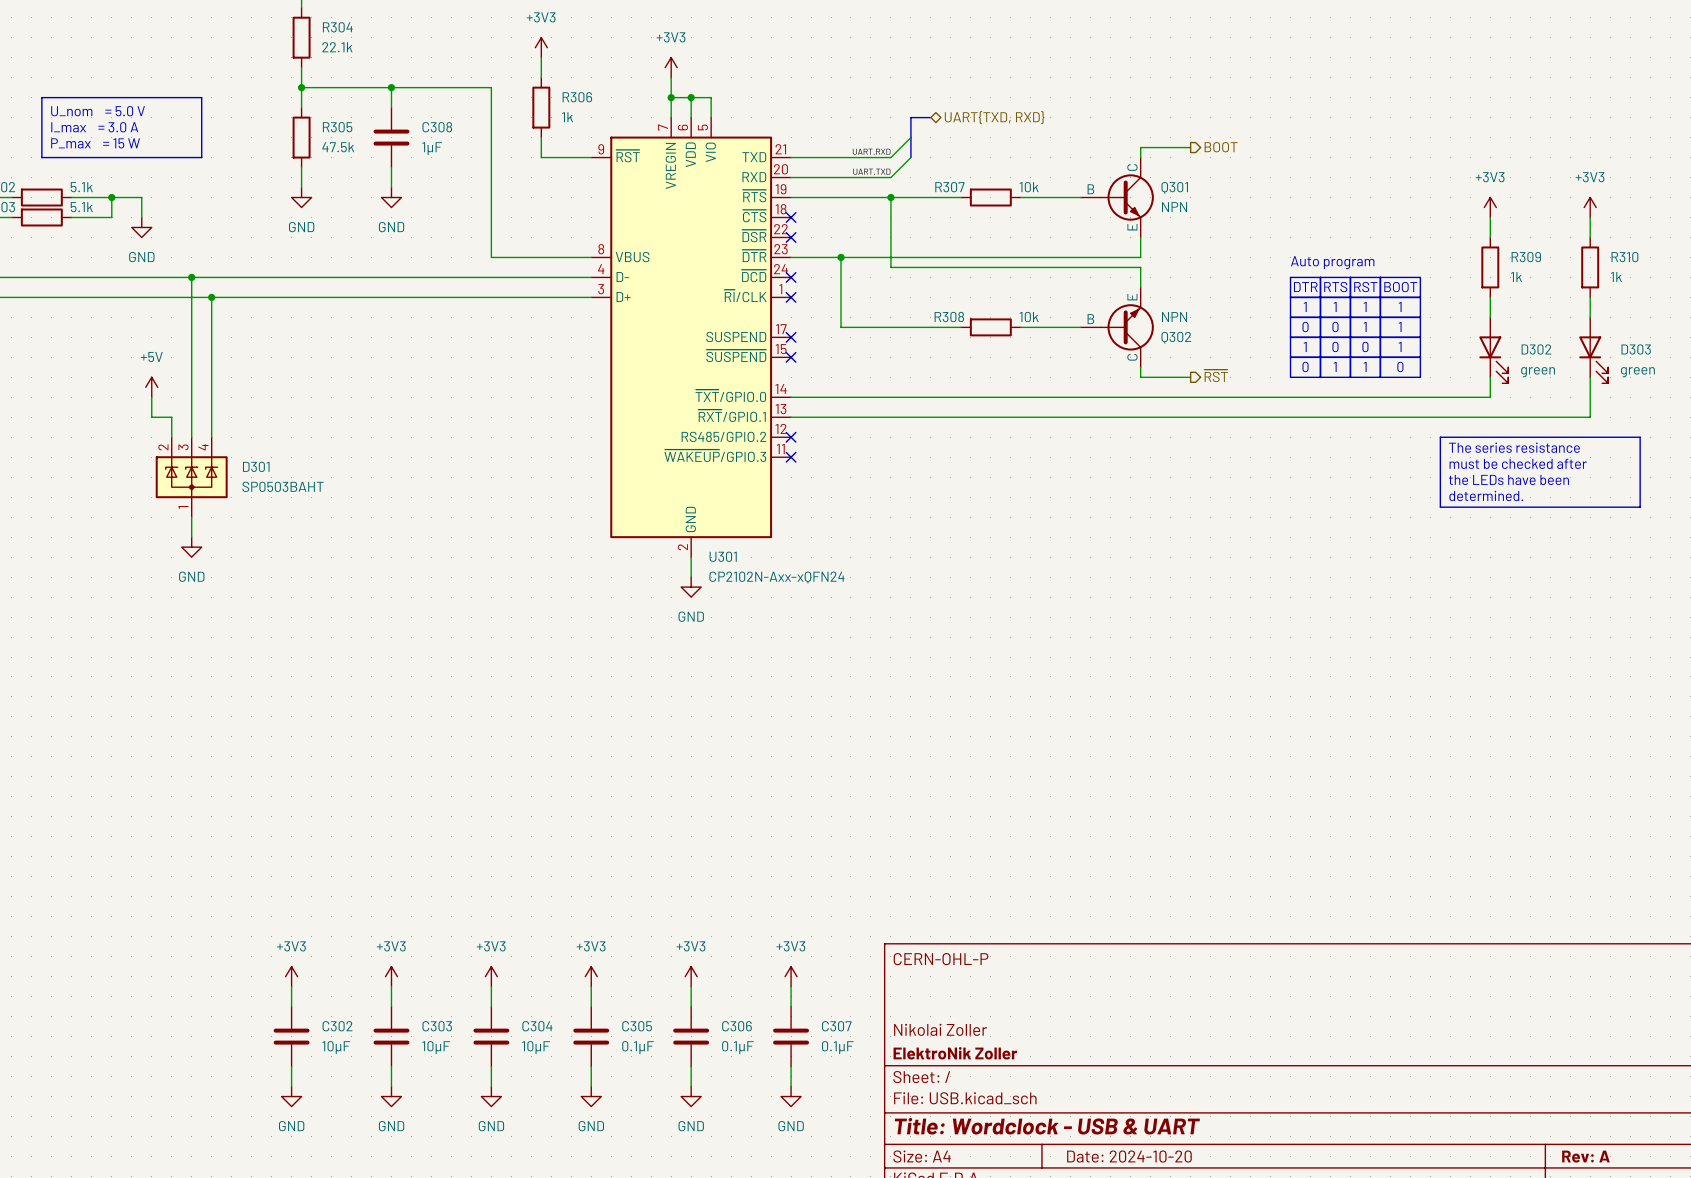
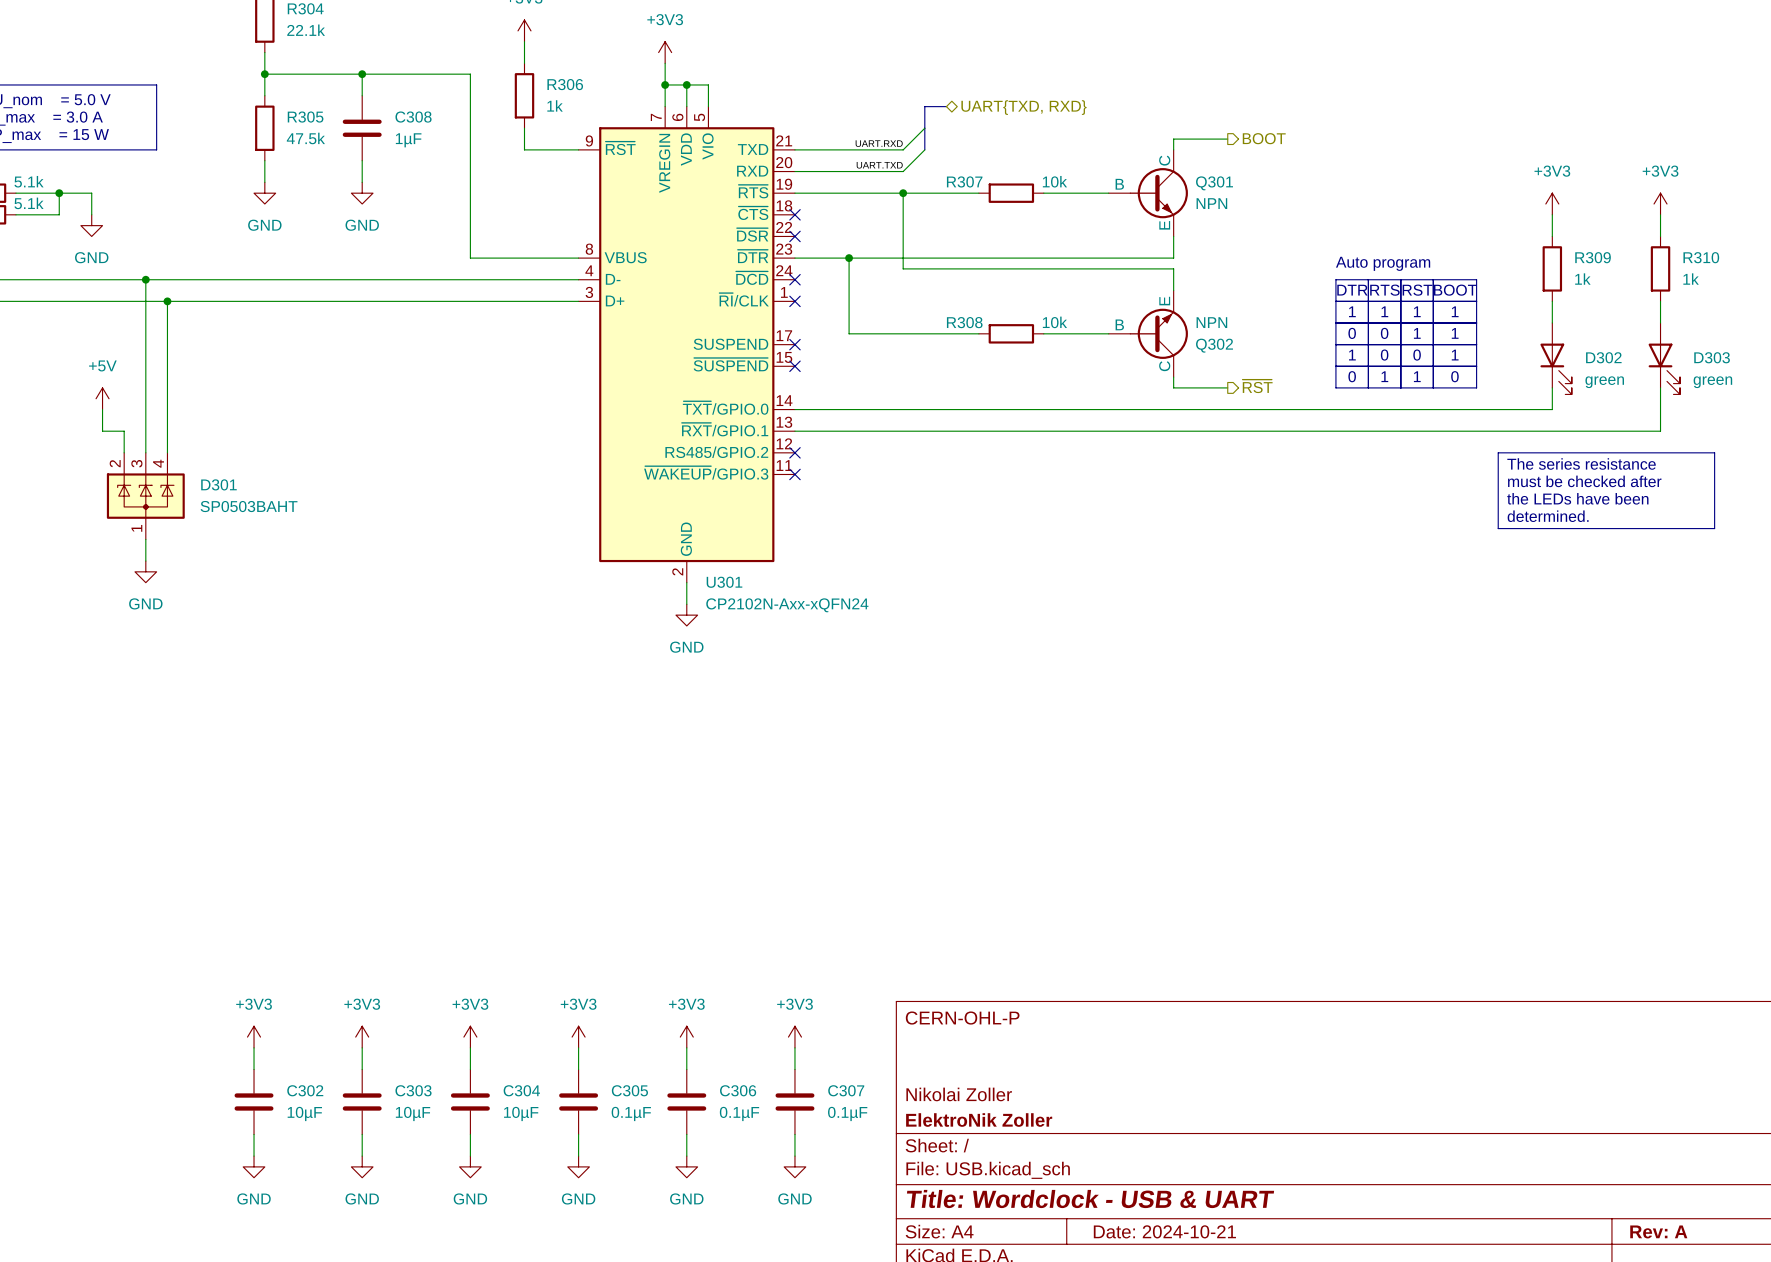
title block: Date: 2024-10-20 (1129, 1156) -> Date: 2024-10-21 (1164, 1231)

